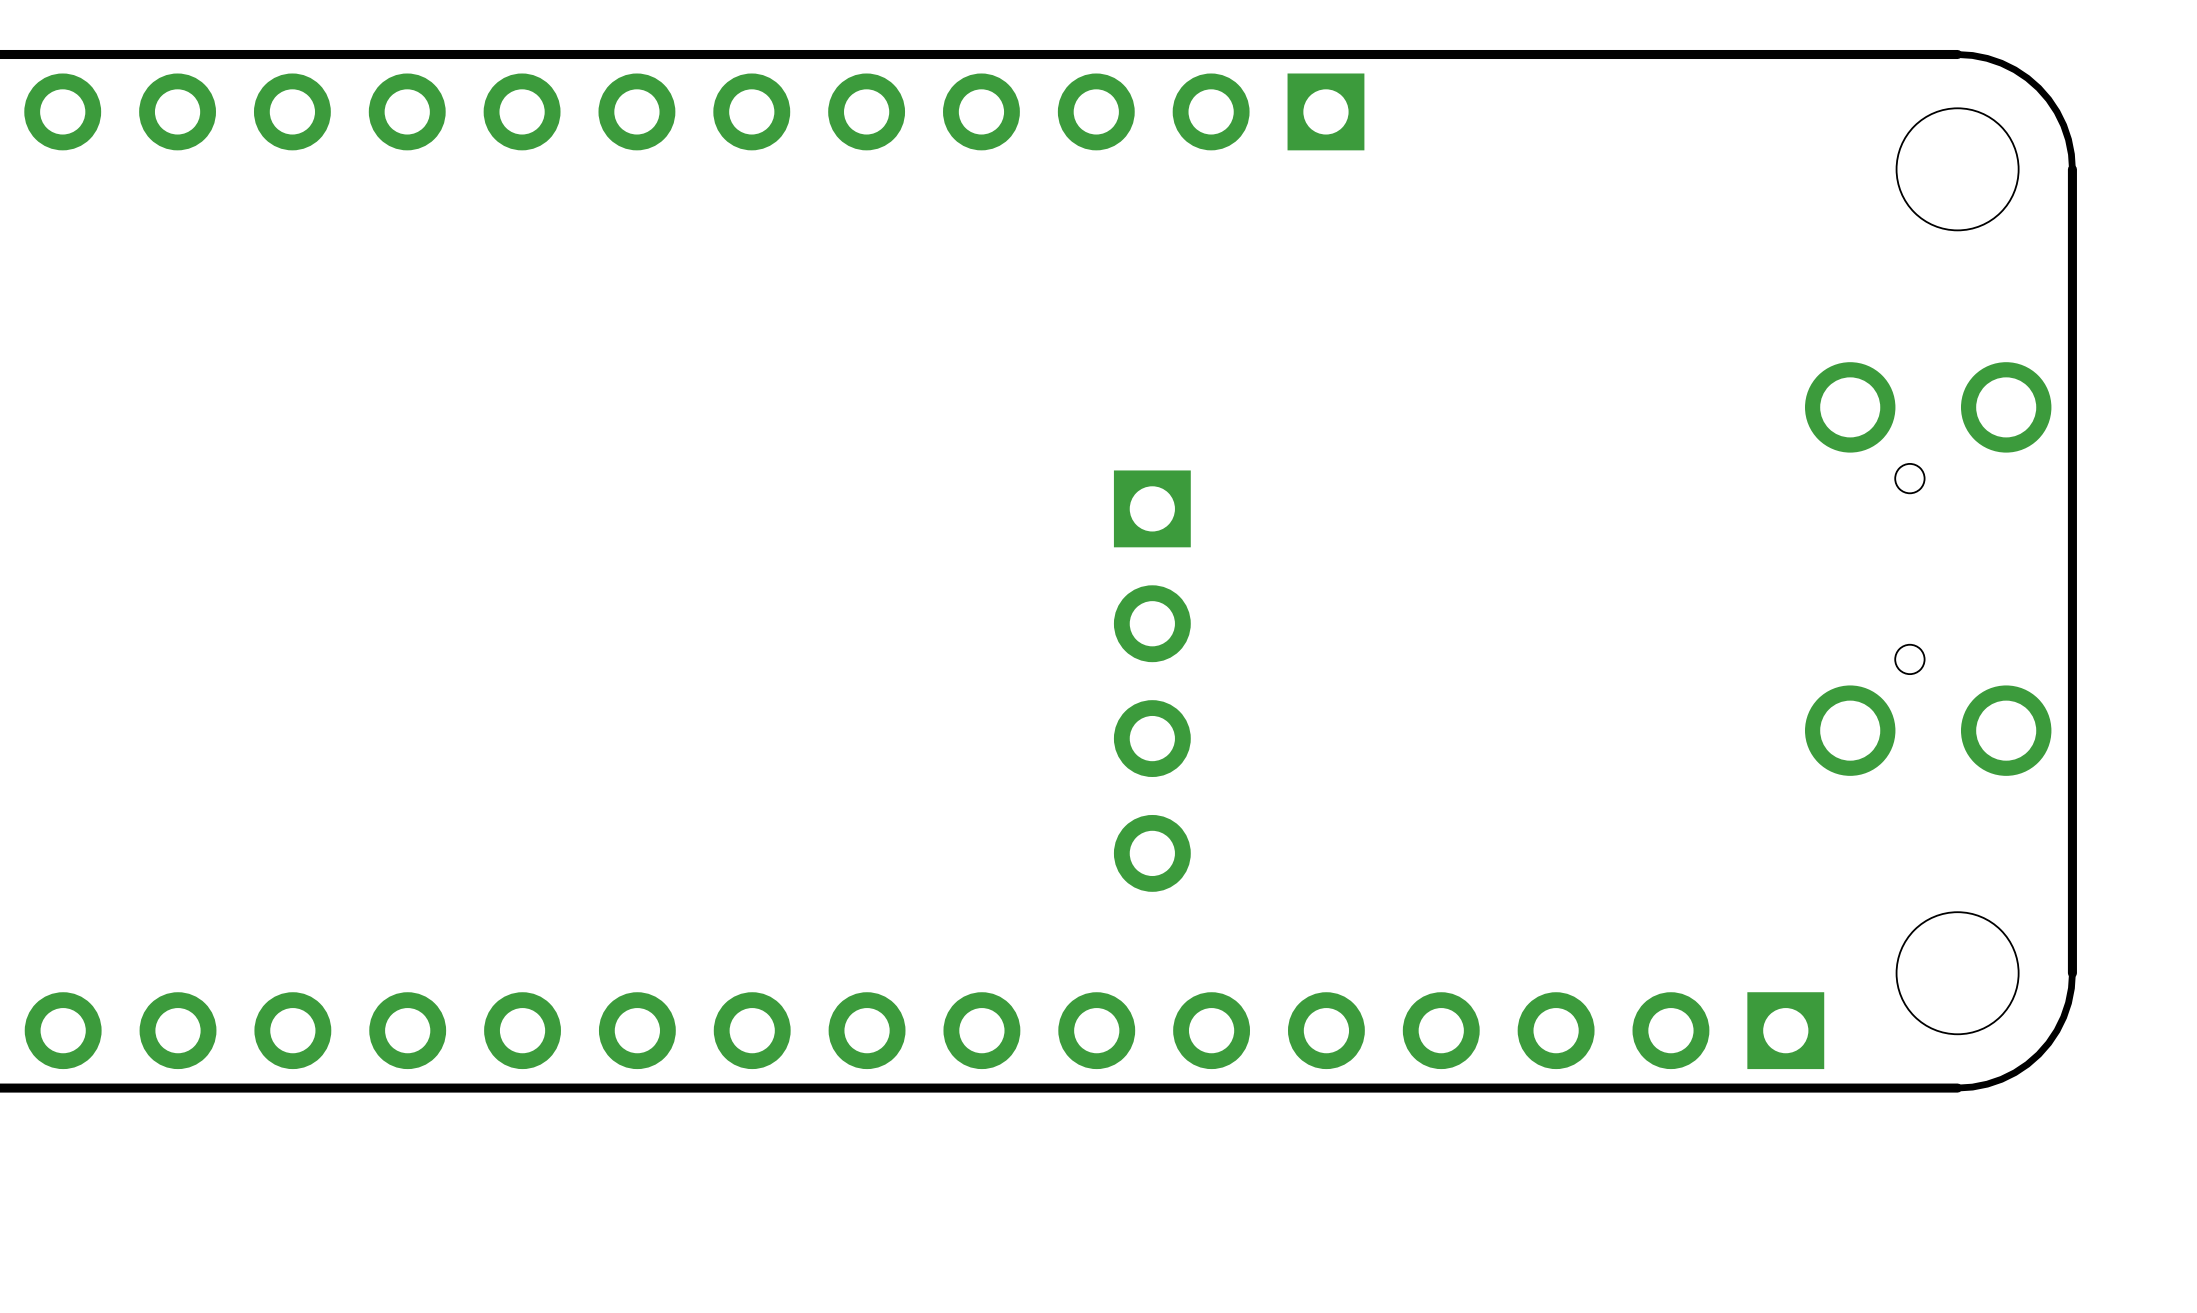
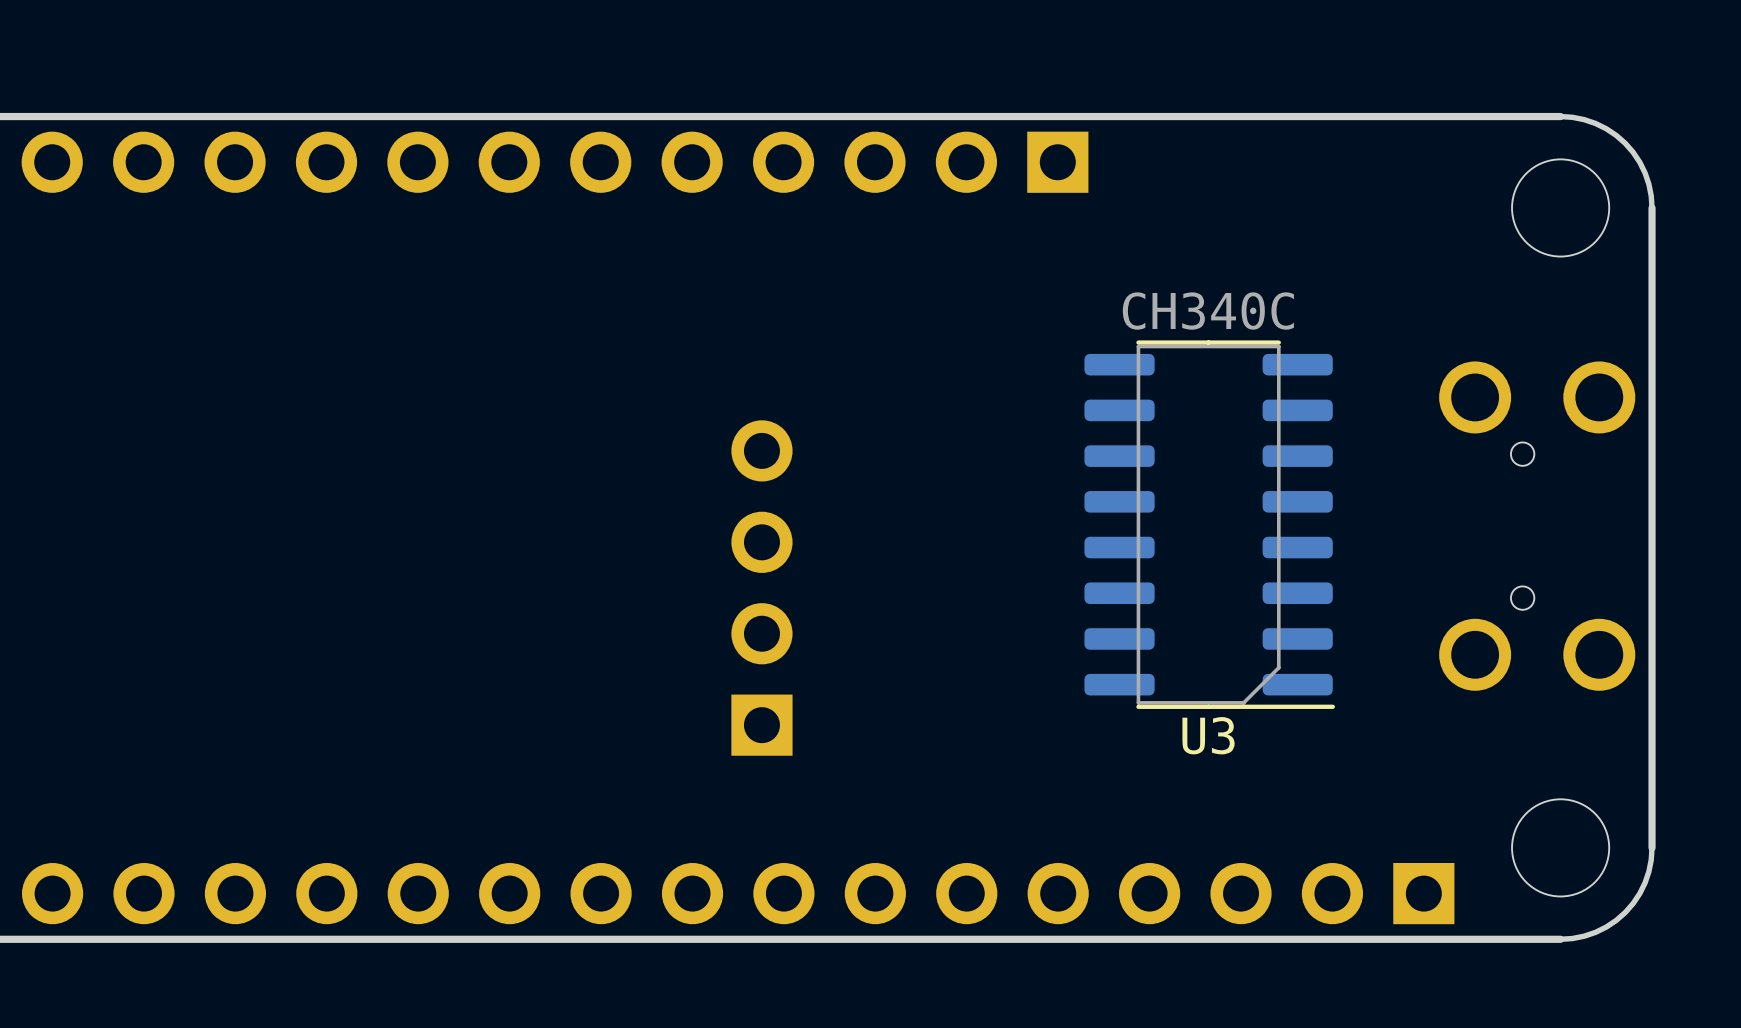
U3: none -> CH340C (1209, 524)
part rotation: 0° (1152, 681) -> 180° (761, 588)

